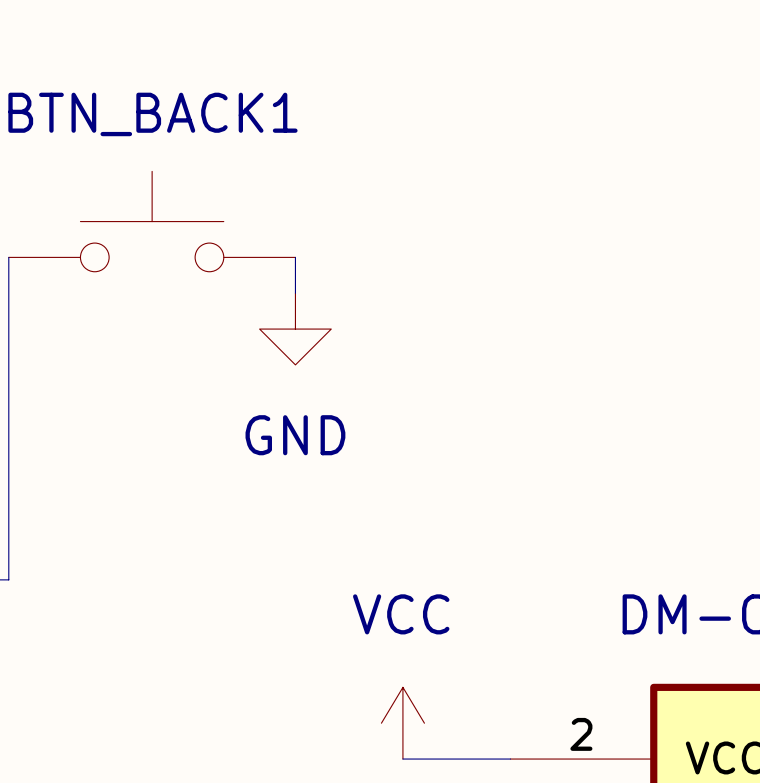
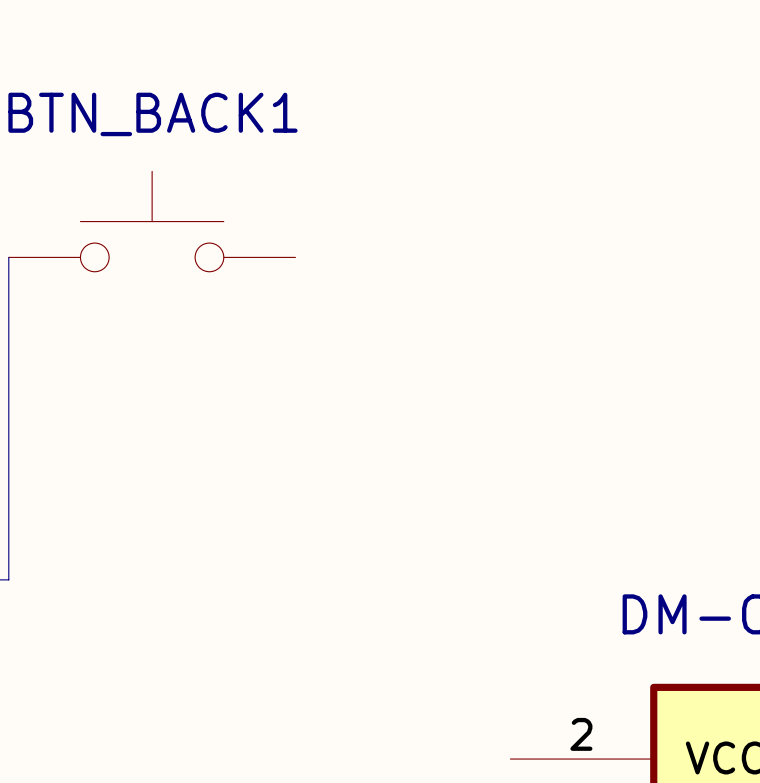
wire: (295, 257) (295, 293) -> none
power symbol: GND (295, 329) -> none
power symbol: VCC (402, 723) -> none
wire: (402, 759) (510, 759) -> none

